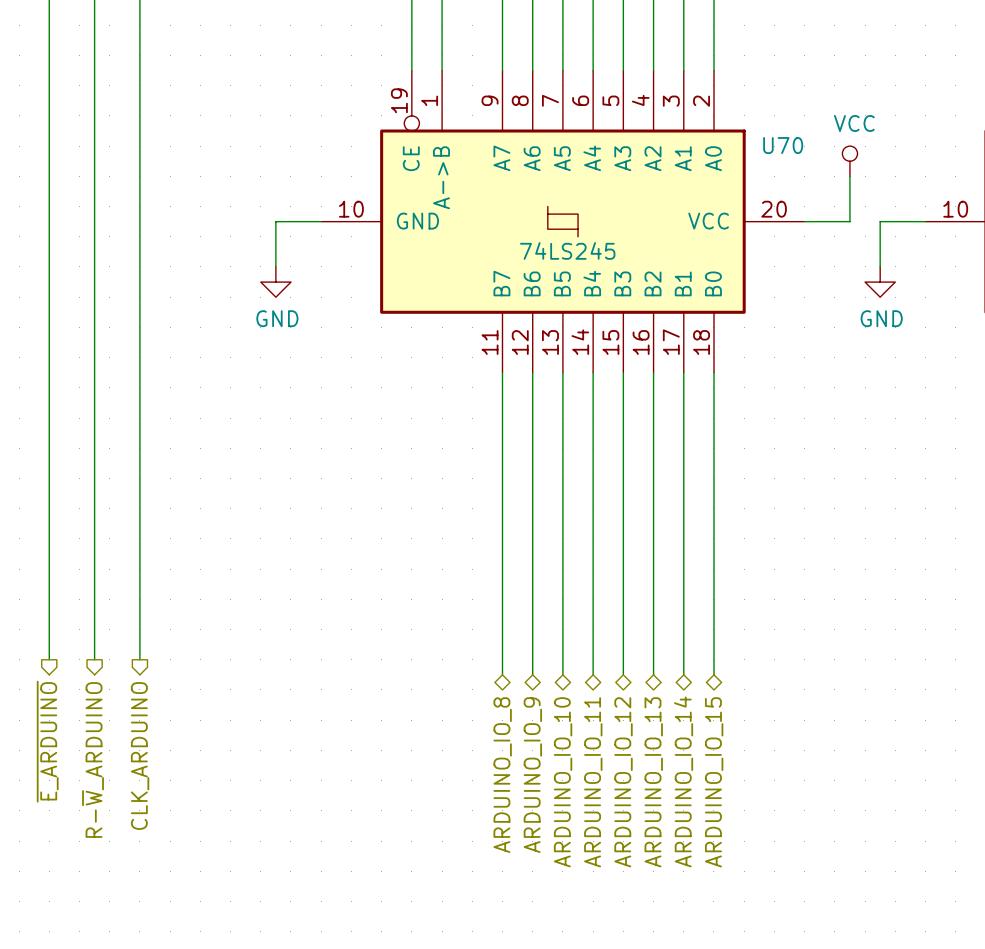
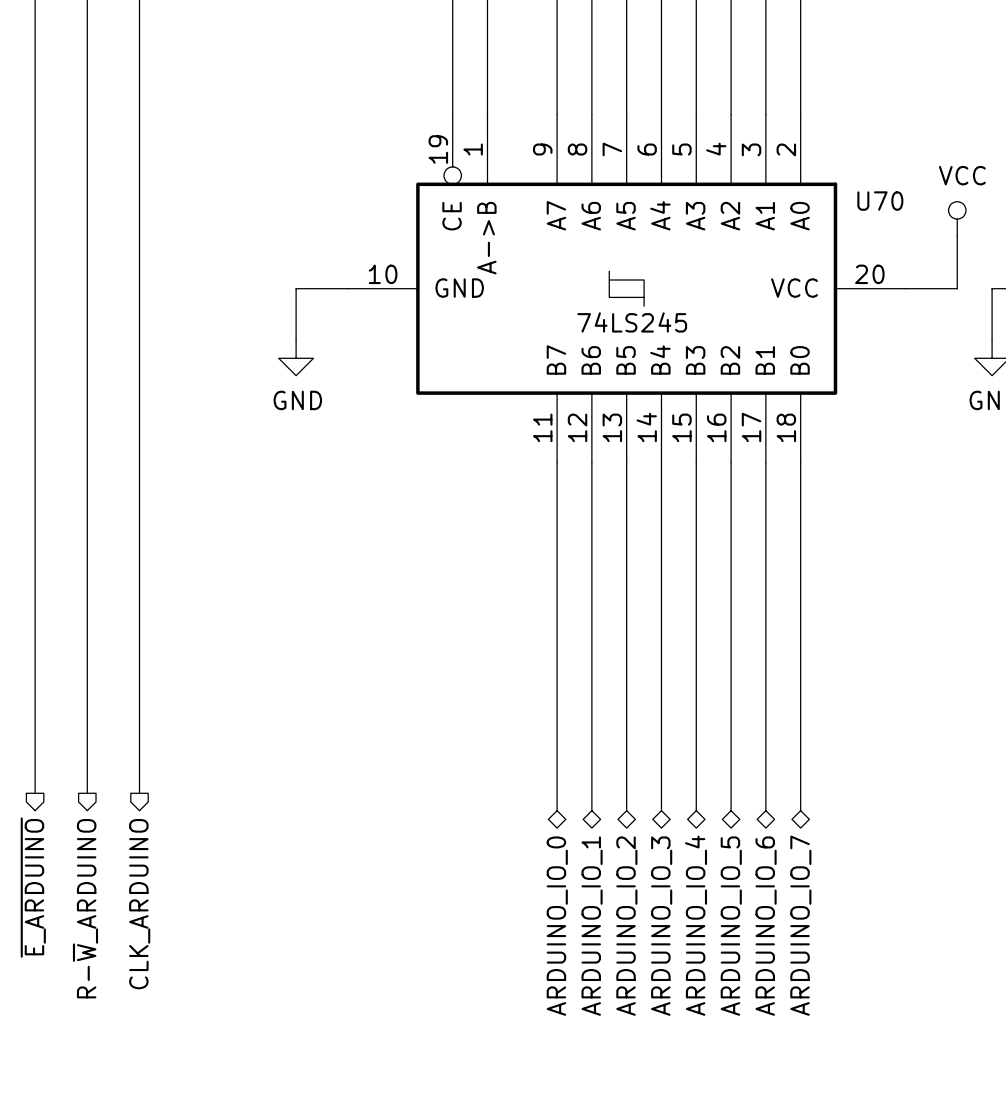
hierarchical label: ARDUINO_IO_8 (502, 775) -> ARDUINO_IO_0 (557, 926)
hierarchical label: ARDUINO_IO_9 (532, 775) -> ARDUINO_IO_1 (592, 926)
hierarchical label: ARDUINO_IO_14 (683, 781) -> ARDUINO_IO_6 (766, 926)
hierarchical label: ARDUINO_IO_10 (563, 782) -> ARDUINO_IO_2 (626, 926)
hierarchical label: ARDUINO_IO_11 (593, 782) -> ARDUINO_IO_3 (661, 926)
hierarchical label: ARDUINO_IO_12 (623, 782) -> ARDUINO_IO_4 (696, 925)
hierarchical label: ARDUINO_IO_13 (653, 782) -> ARDUINO_IO_5 (731, 926)
hierarchical label: ARDUINO_IO_15 (714, 782) -> ARDUINO_IO_7 (800, 925)

